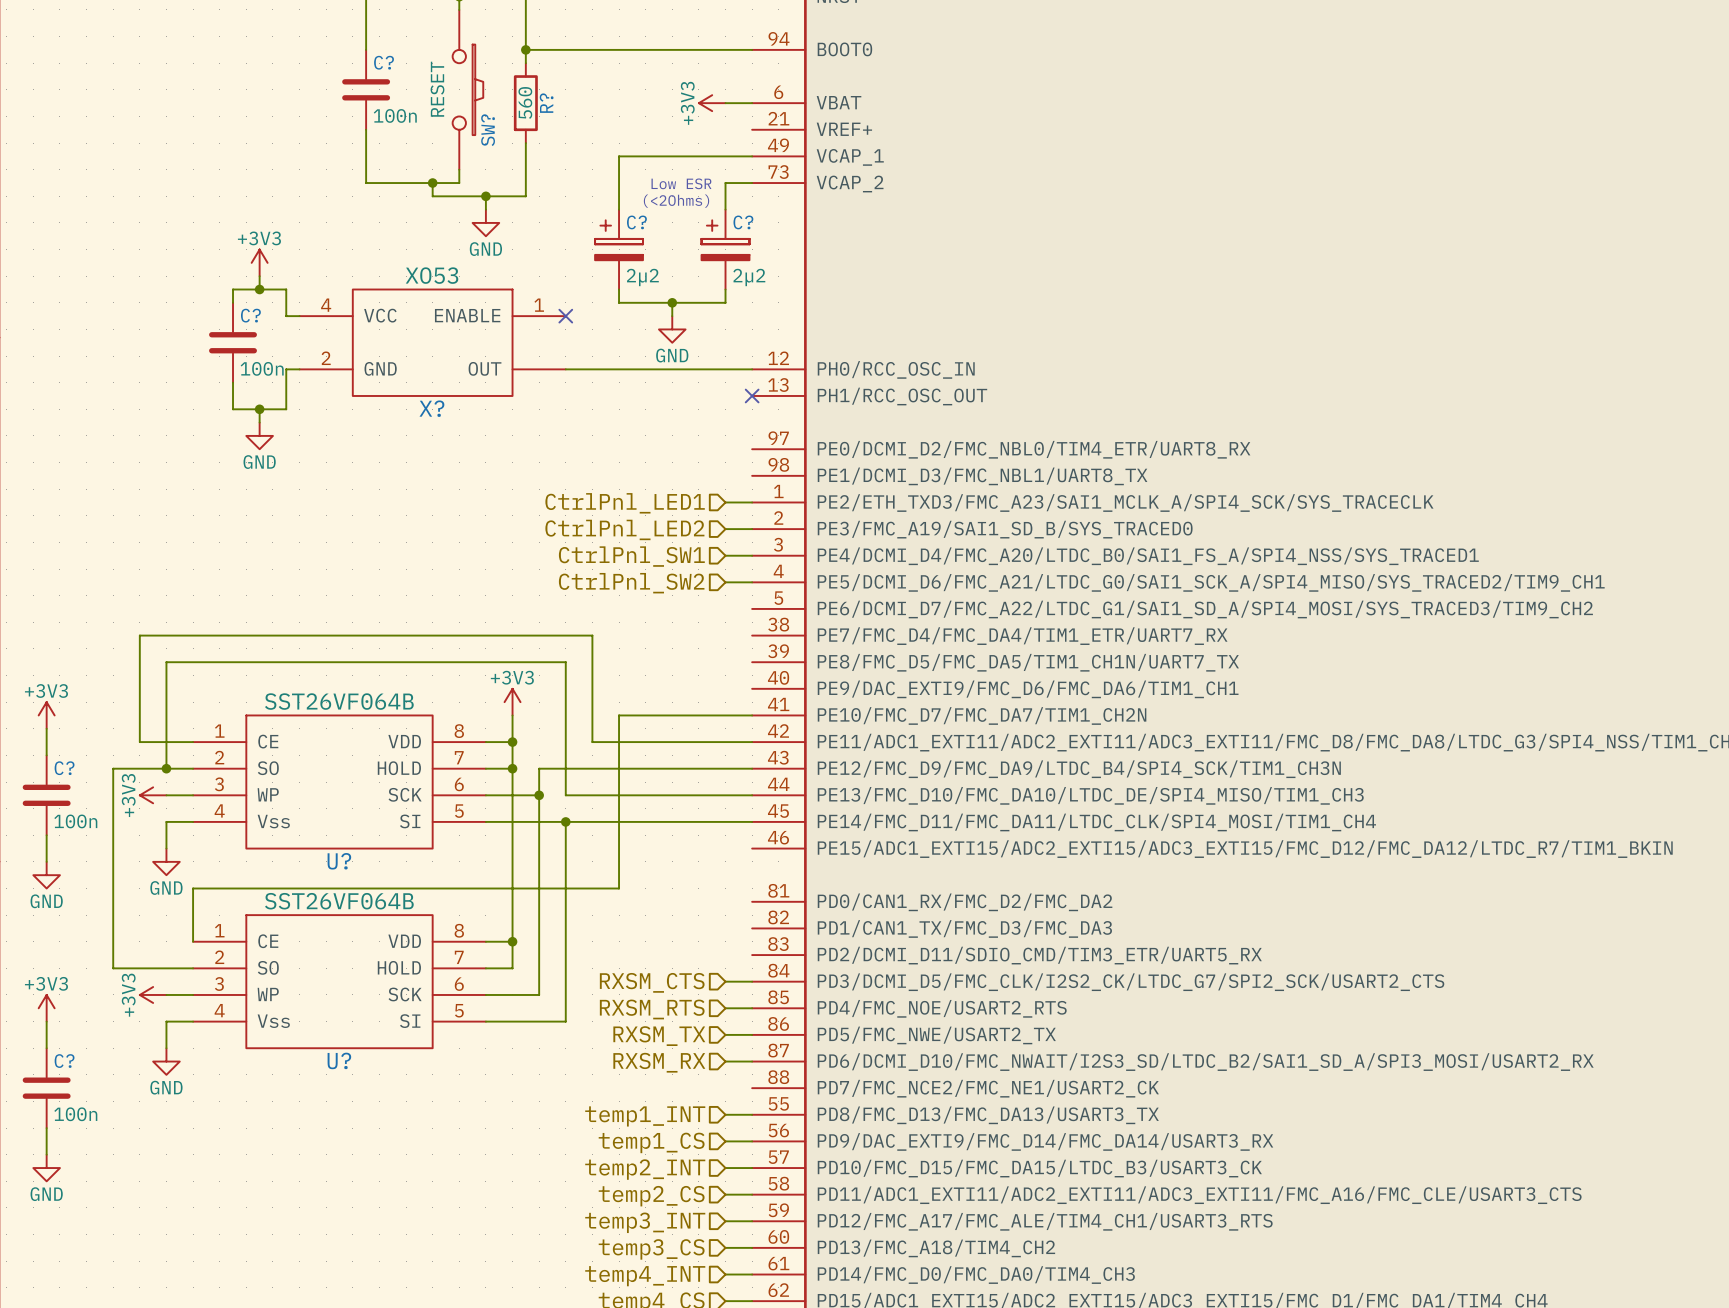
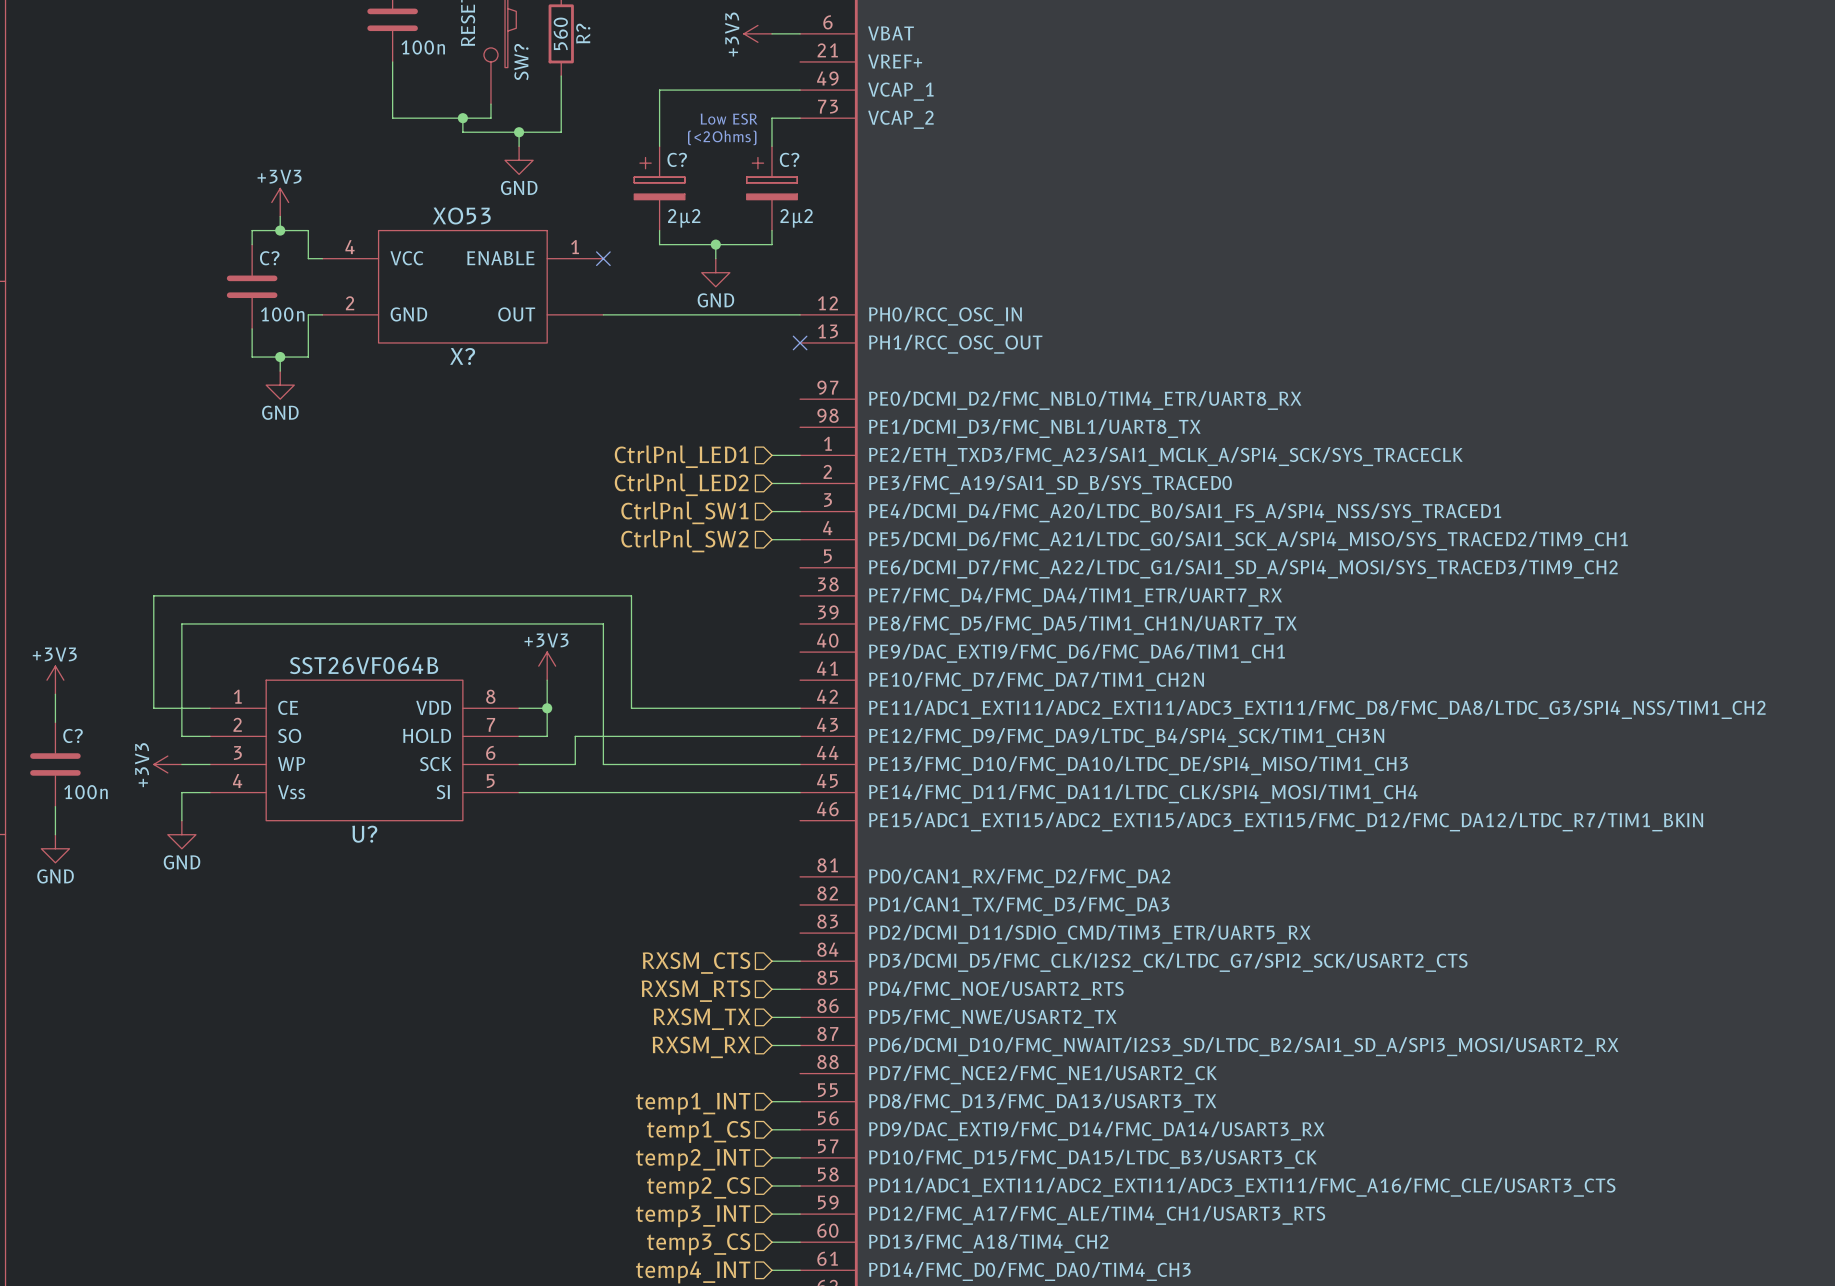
wire: (752, 715) (619, 715) (619, 888) (193, 888) (193, 941) -> none
wire: (166, 768) (113, 768) (113, 968) (193, 968) -> none
junction: (166, 768) -> none
wire: (512, 768) (512, 968) (485, 968) -> none
junction: (512, 768) -> none
wire: (539, 795) (539, 994) (485, 994) -> none
junction: (539, 795) -> none
wire: (565, 821) (565, 1021) (485, 1021) -> none
junction: (565, 821) -> none
wire: (485, 941) (512, 941) -> none
junction: (512, 941) -> none
U?: SST26VF064B (339, 981) -> none
power symbol: +3V3 (153, 994) -> none
wire: (166, 994) (193, 994) -> none
power symbol: +3V3 (46, 1008) -> none
wire: (46, 1021) (46, 1048) -> none
wire: (193, 1021) (166, 1021) (166, 1048) -> none
power symbol: GND (166, 1061) -> none
C?: 100n (46, 1088) -> none
wire: (46, 1128) (46, 1154) -> none
power symbol: GND (46, 1168) -> none

